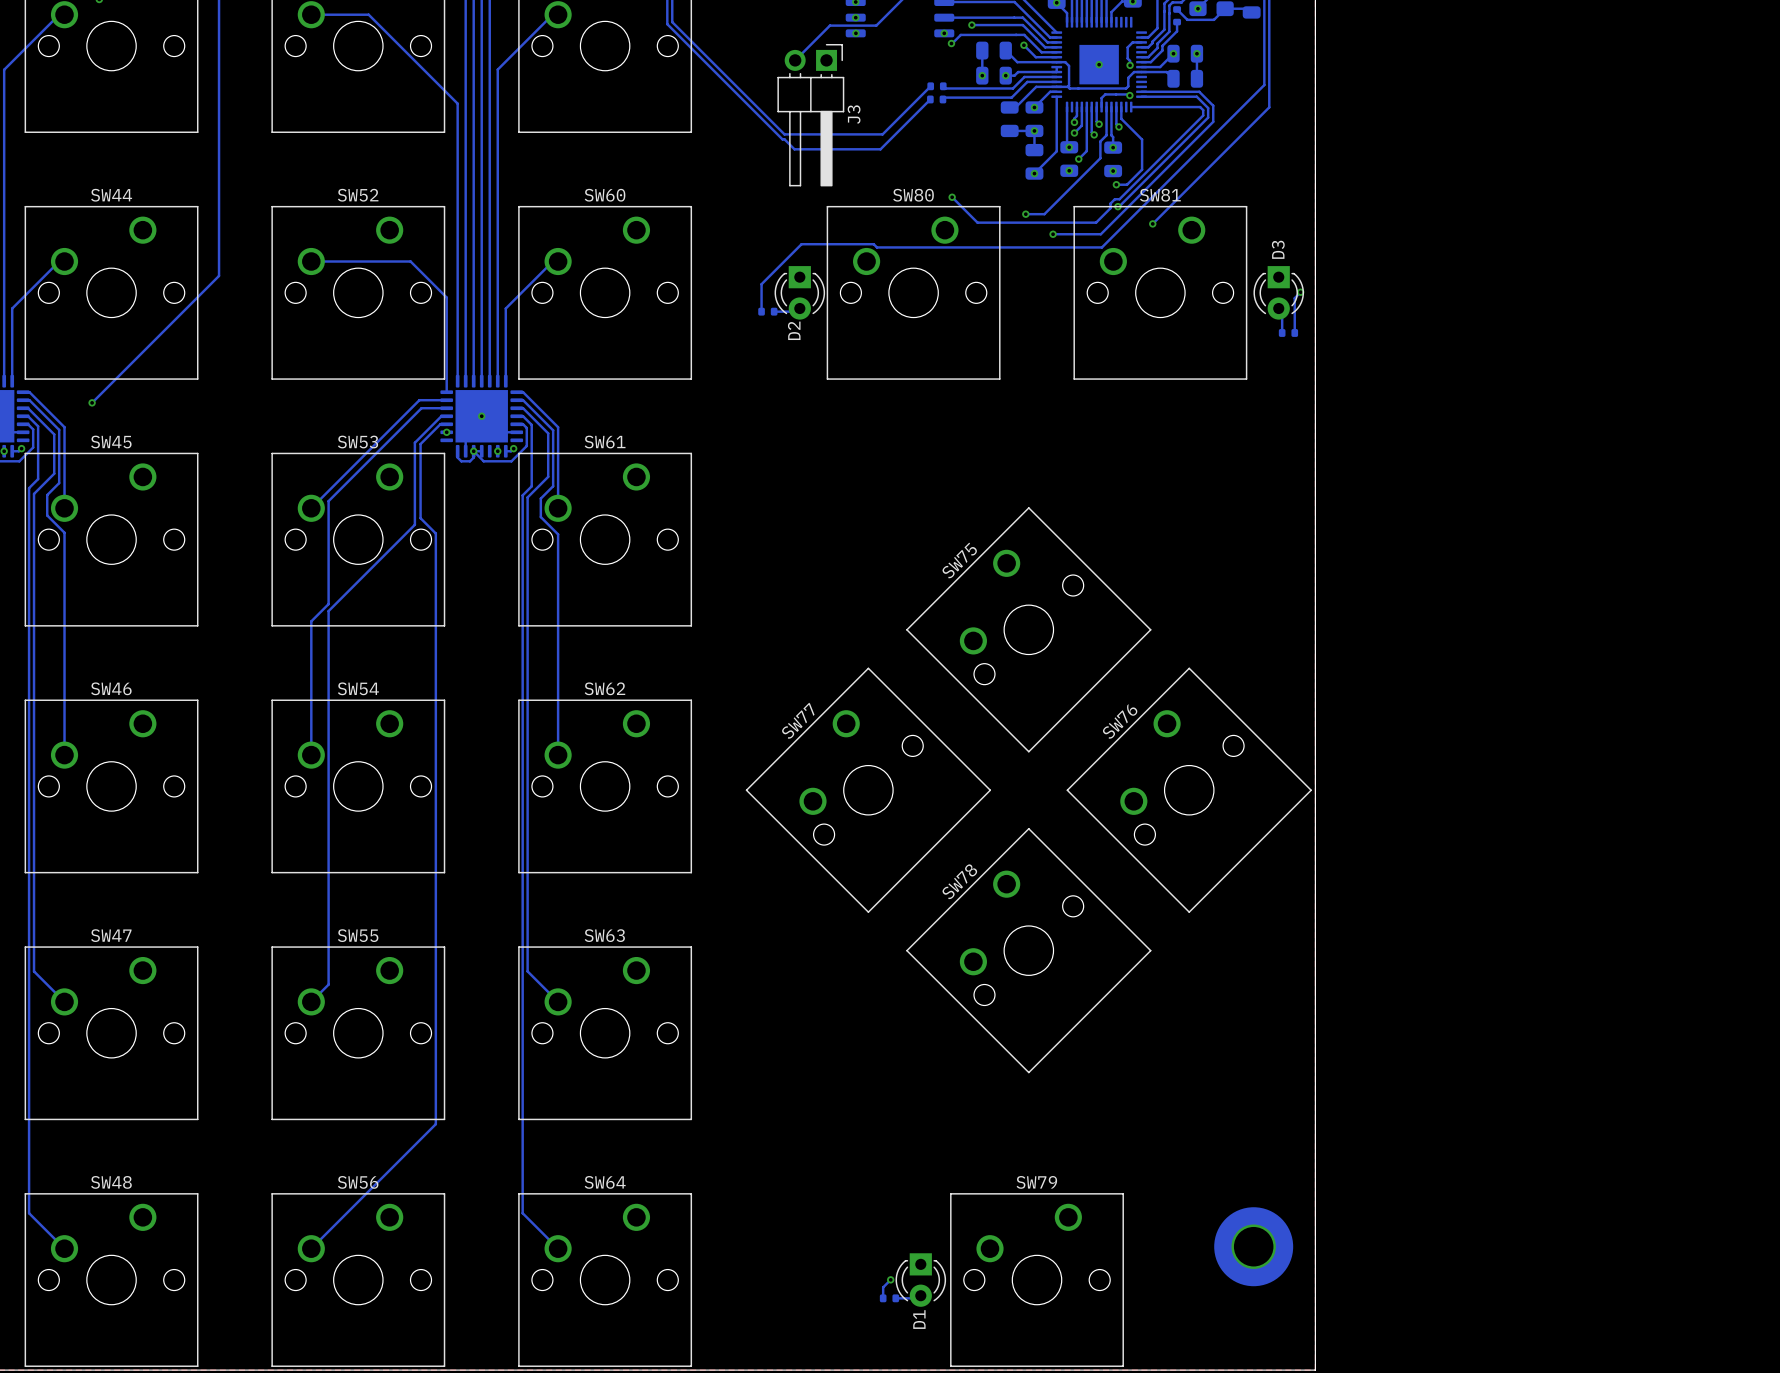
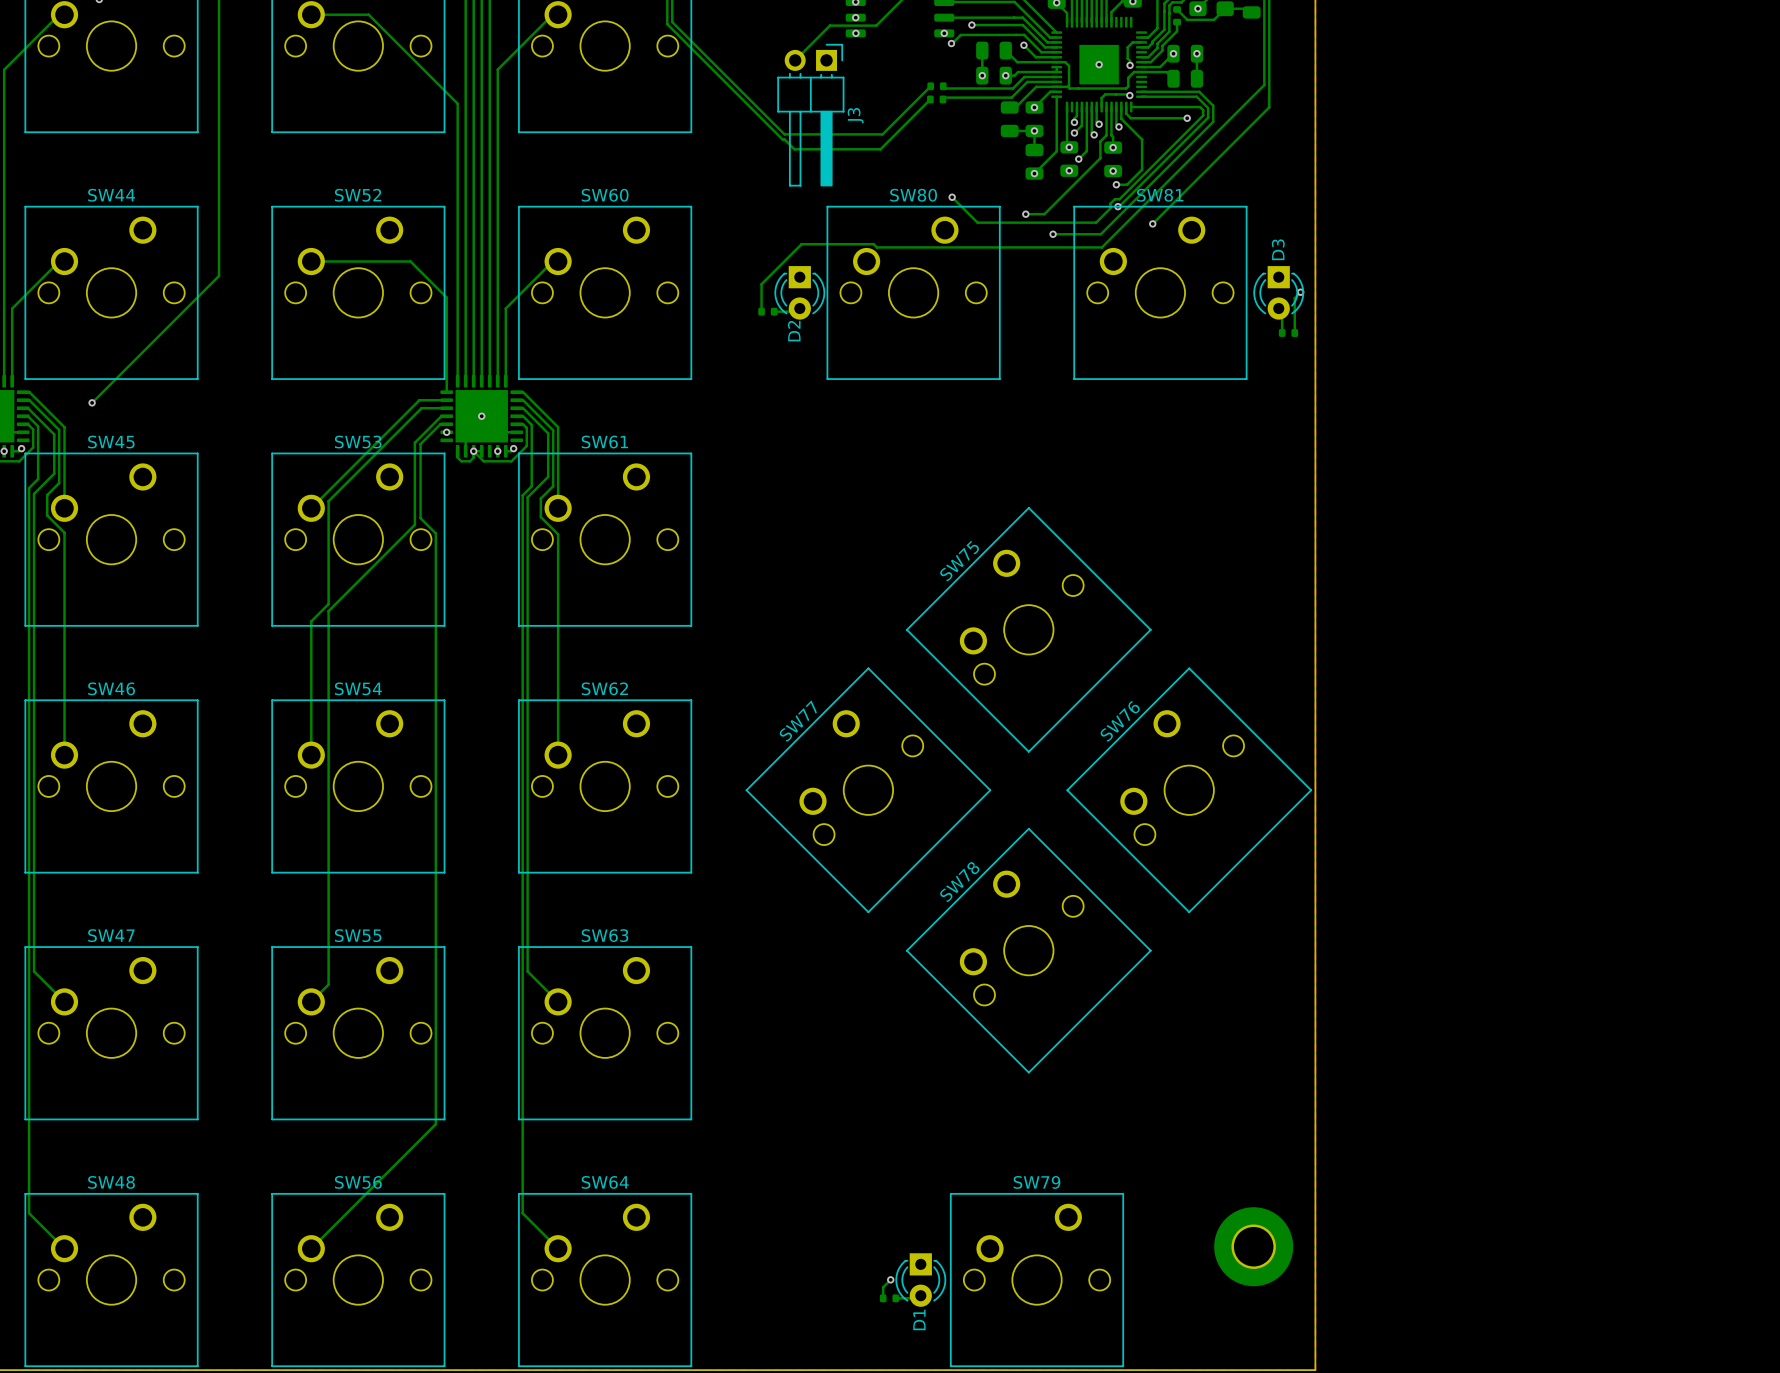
bottom track: none -> (1126, 107) (1126, 113) (1130, 118) (1187, 118)
via: none -> (1187, 118)

